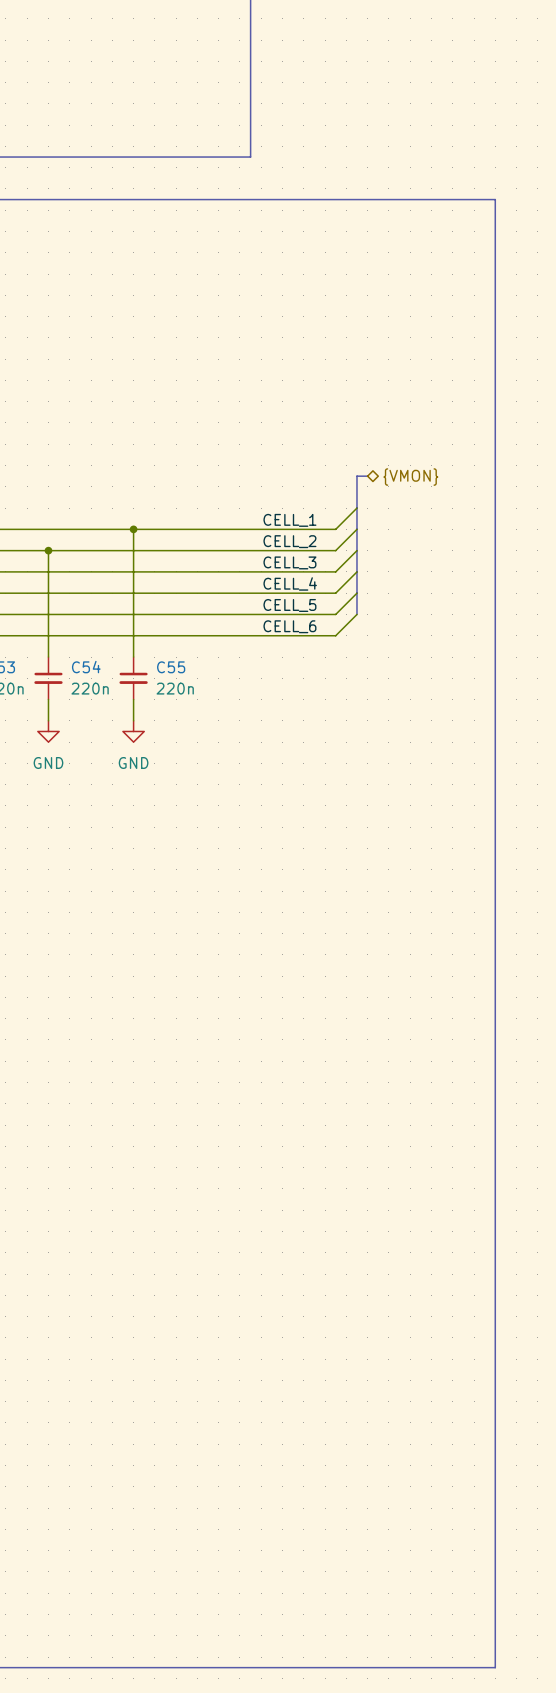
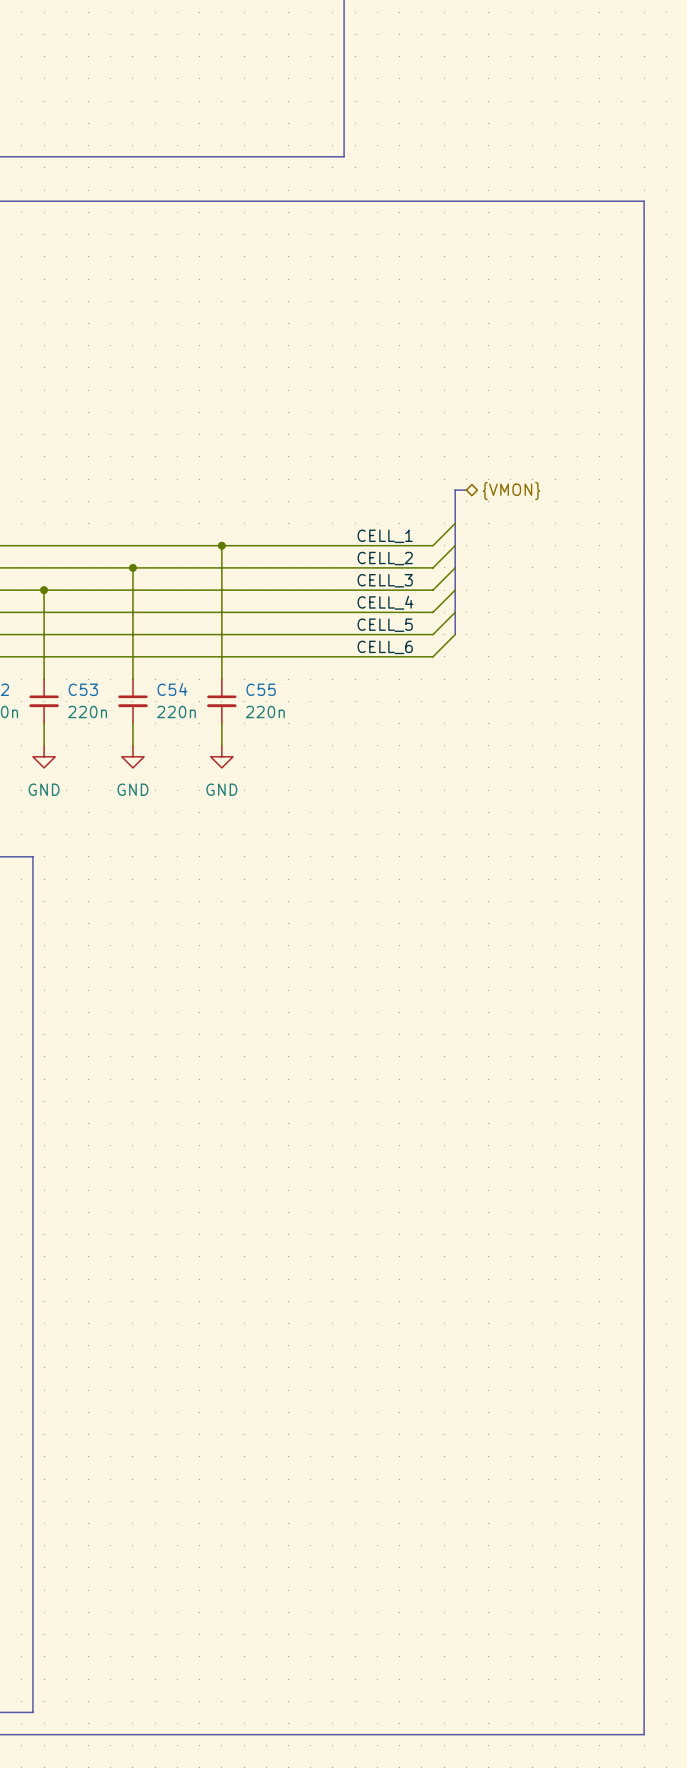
line: (495, 199) (495, 1667) -> (599, 201) (644, 201) (644, 1734) (599, 1734)

